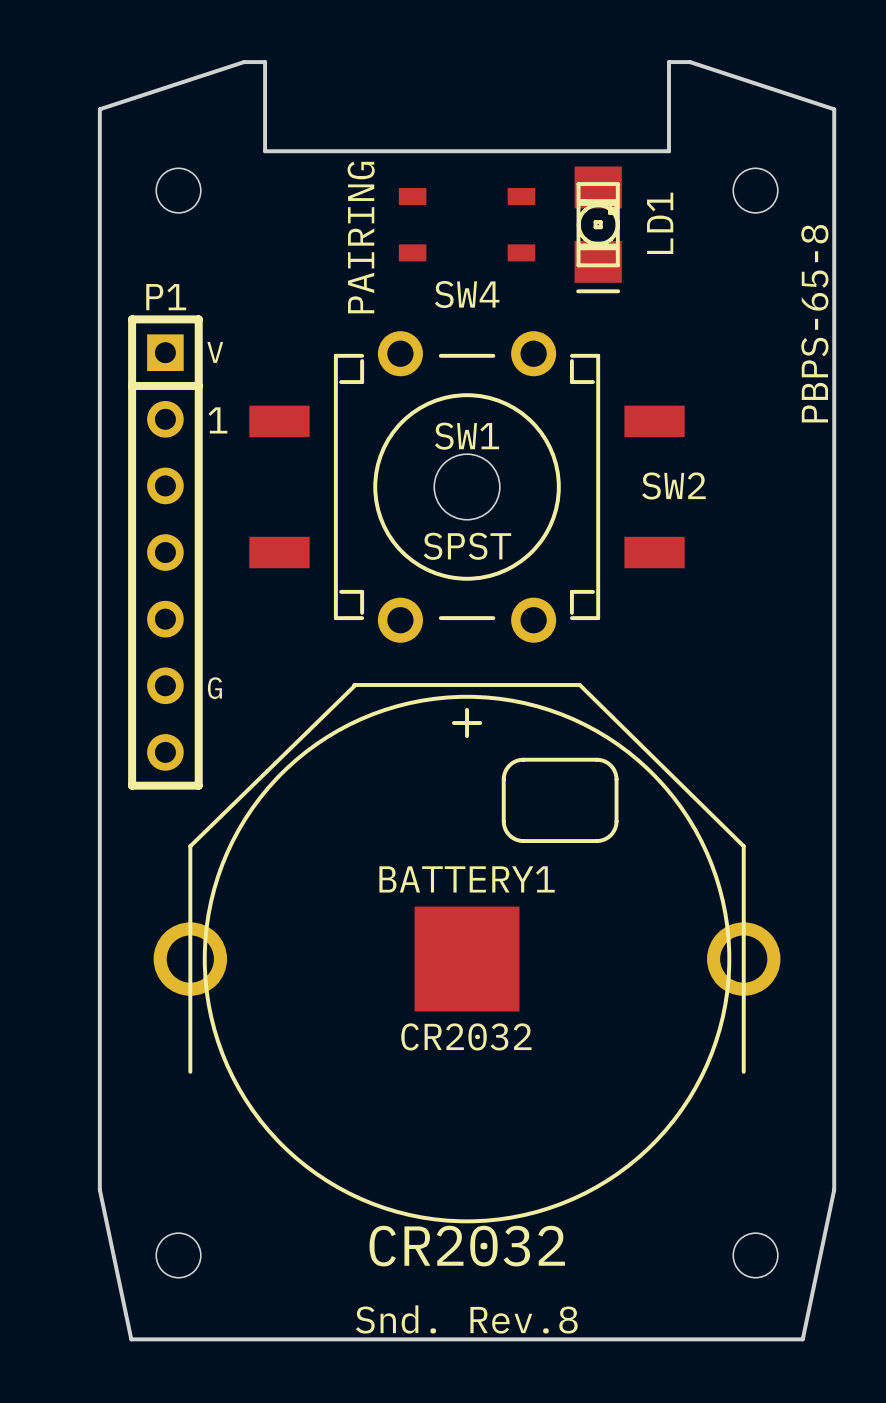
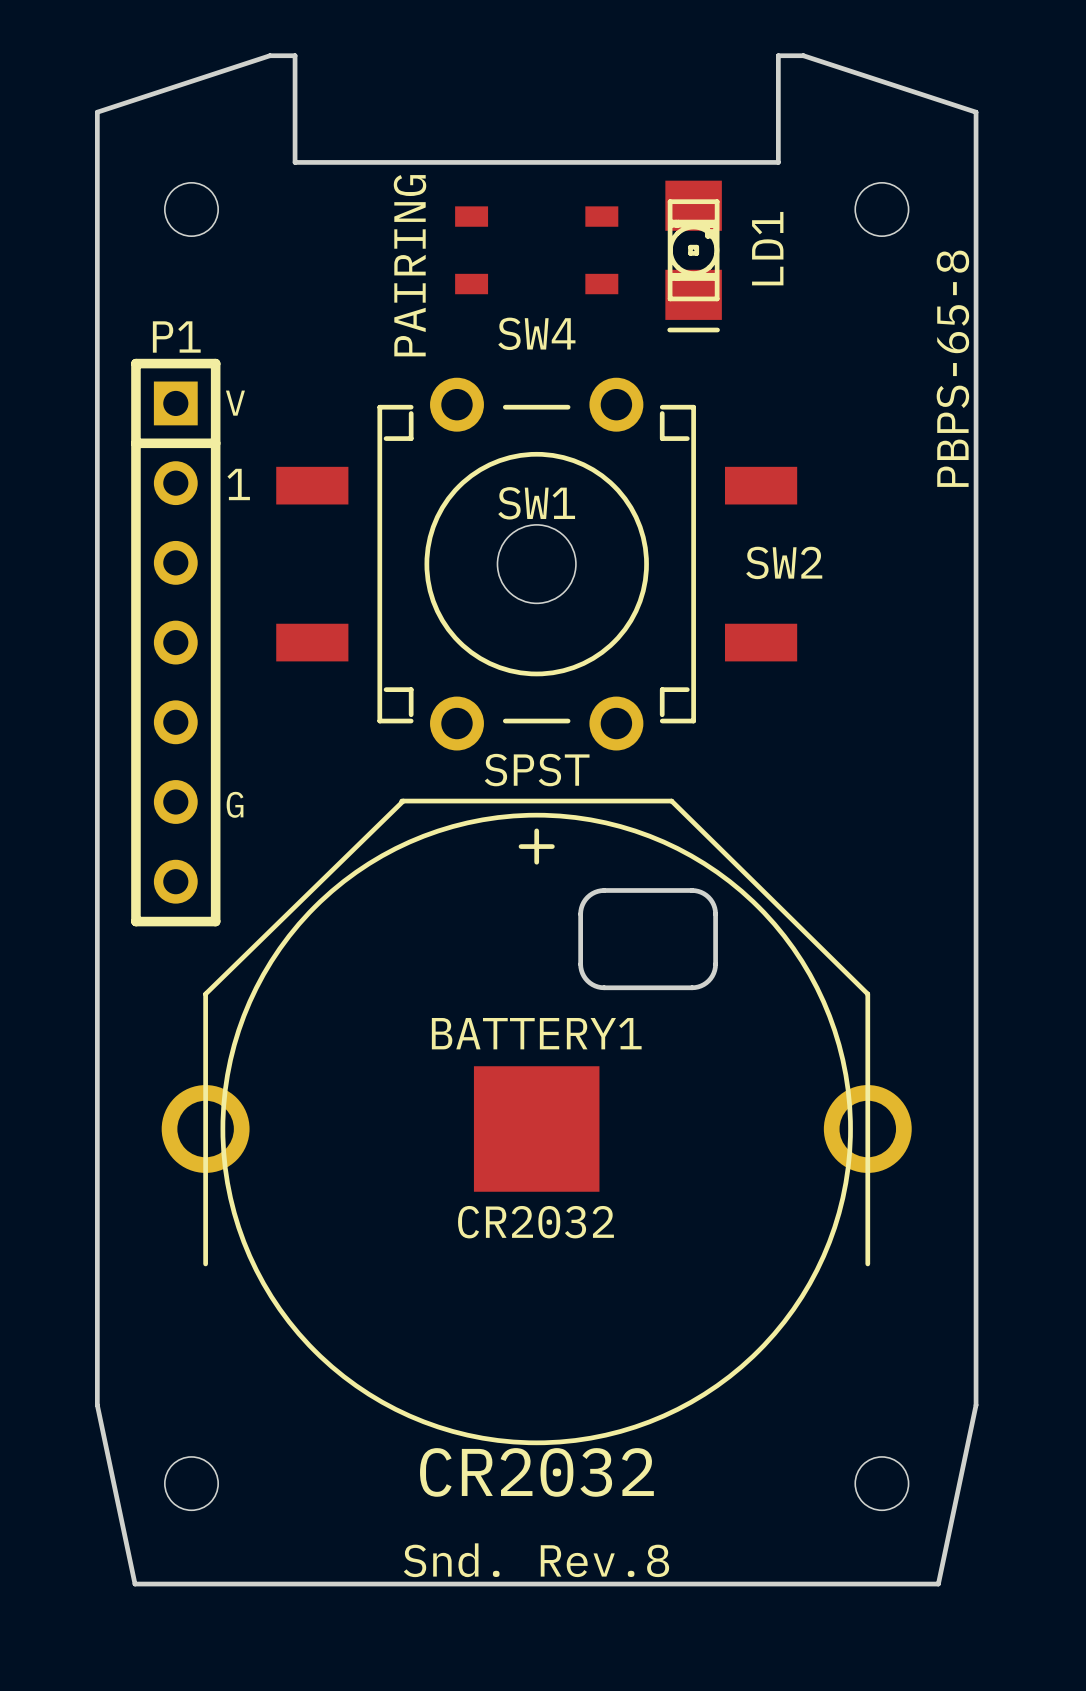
SW2 value position: SPST (467, 546) -> SPST (537, 770)
part footprint: [501, 757, 619, 844] -> [578, 888, 718, 991]

